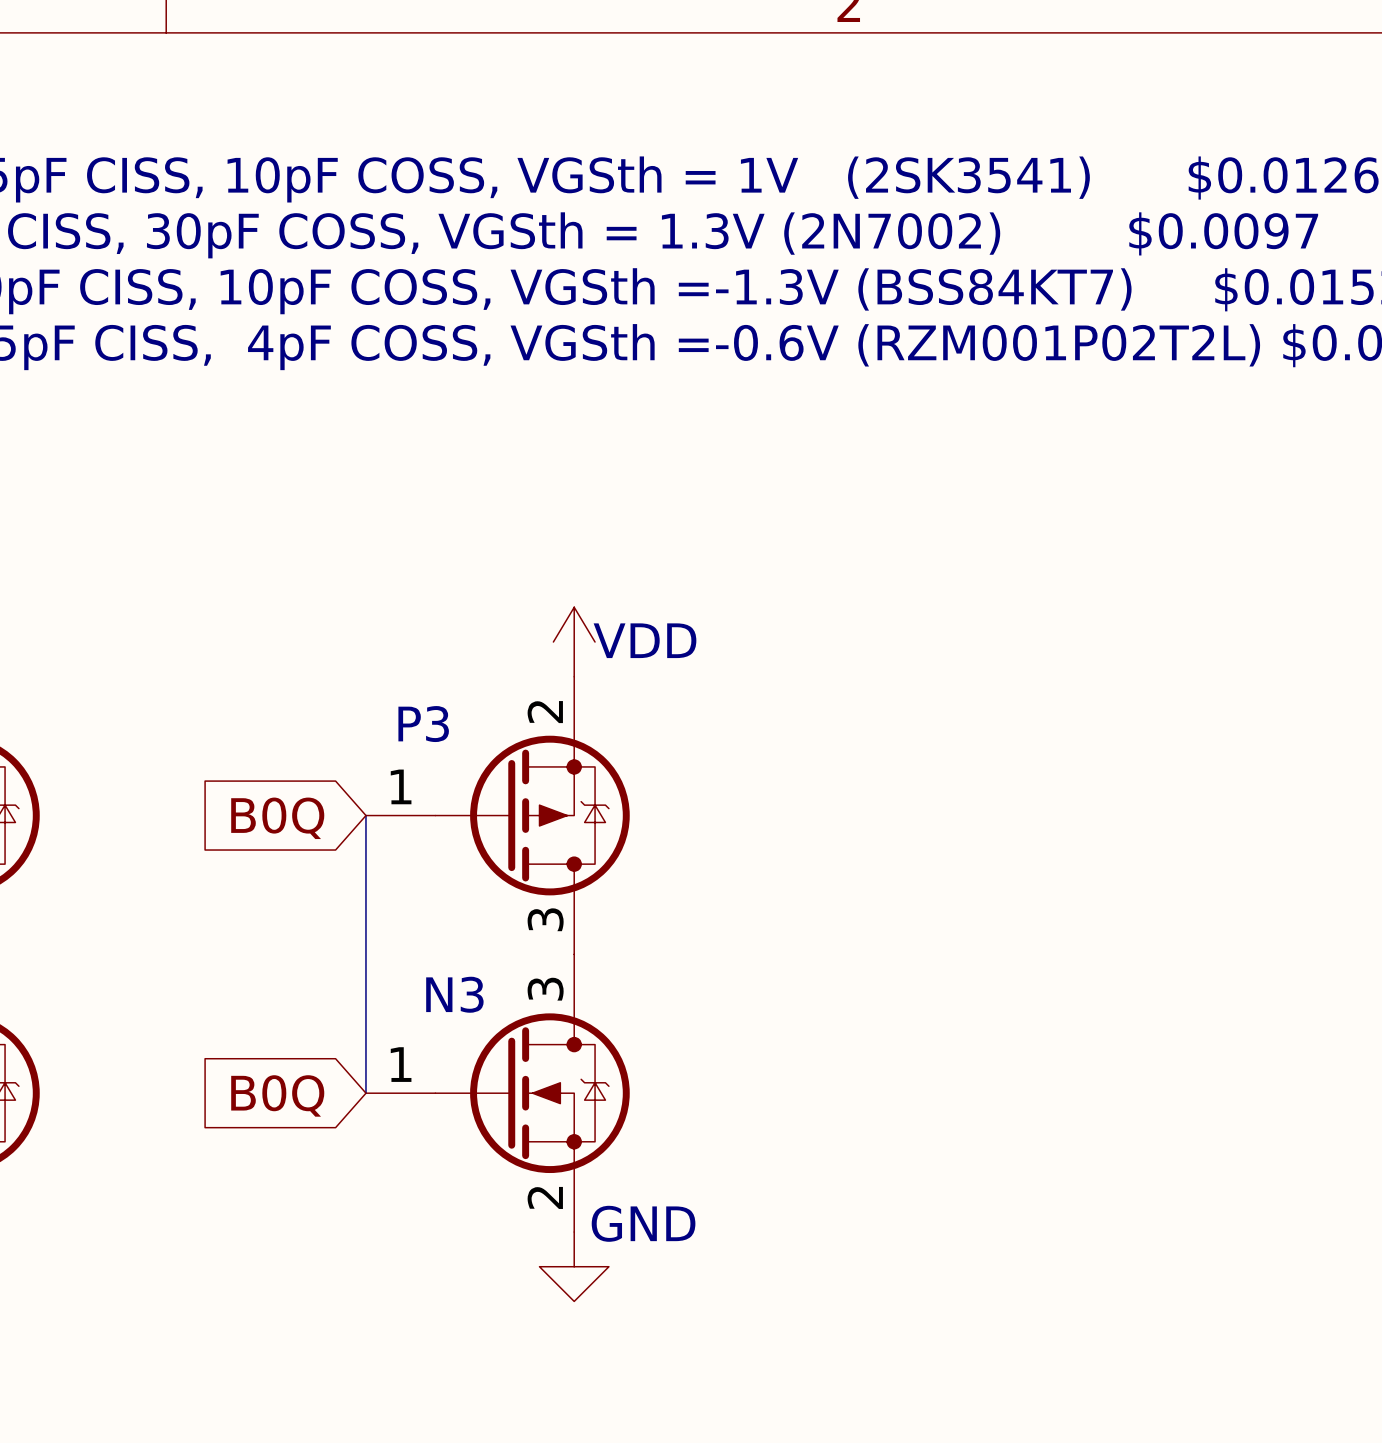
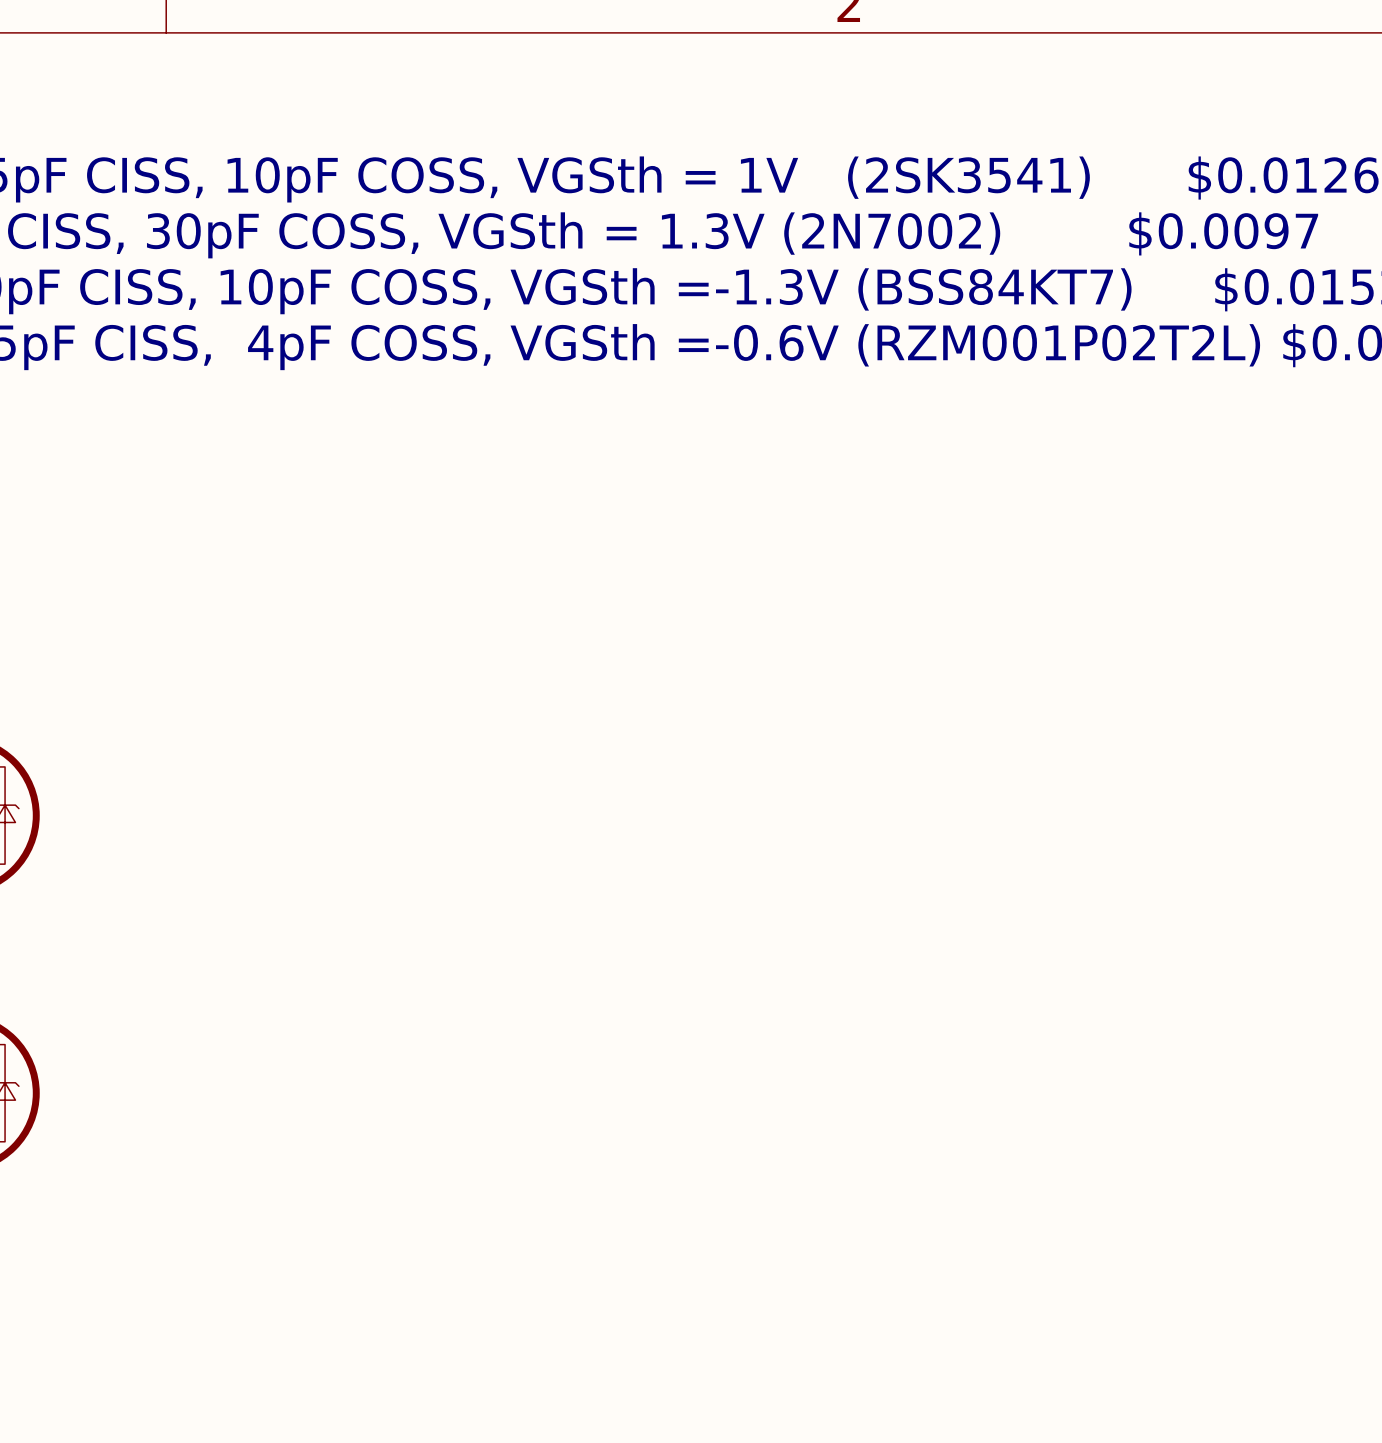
power symbol: VDD (574, 642) -> none
wire: (365, 815) (365, 1093) -> none
P3: (497, 815) -> none
global label: B0Q (277, 818) -> none
N3: (497, 1093) -> none
global label: B0Q (277, 1095) -> none
power symbol: GND (574, 1266) -> none

